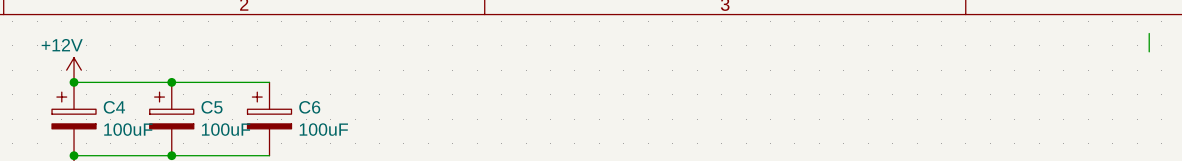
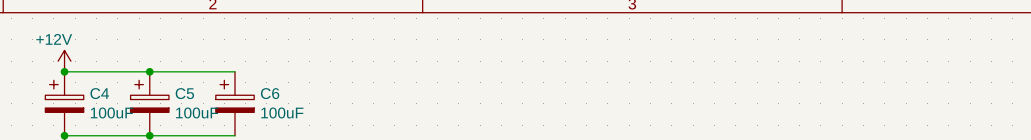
wire: (1149, 33) (1149, 51) -> none

